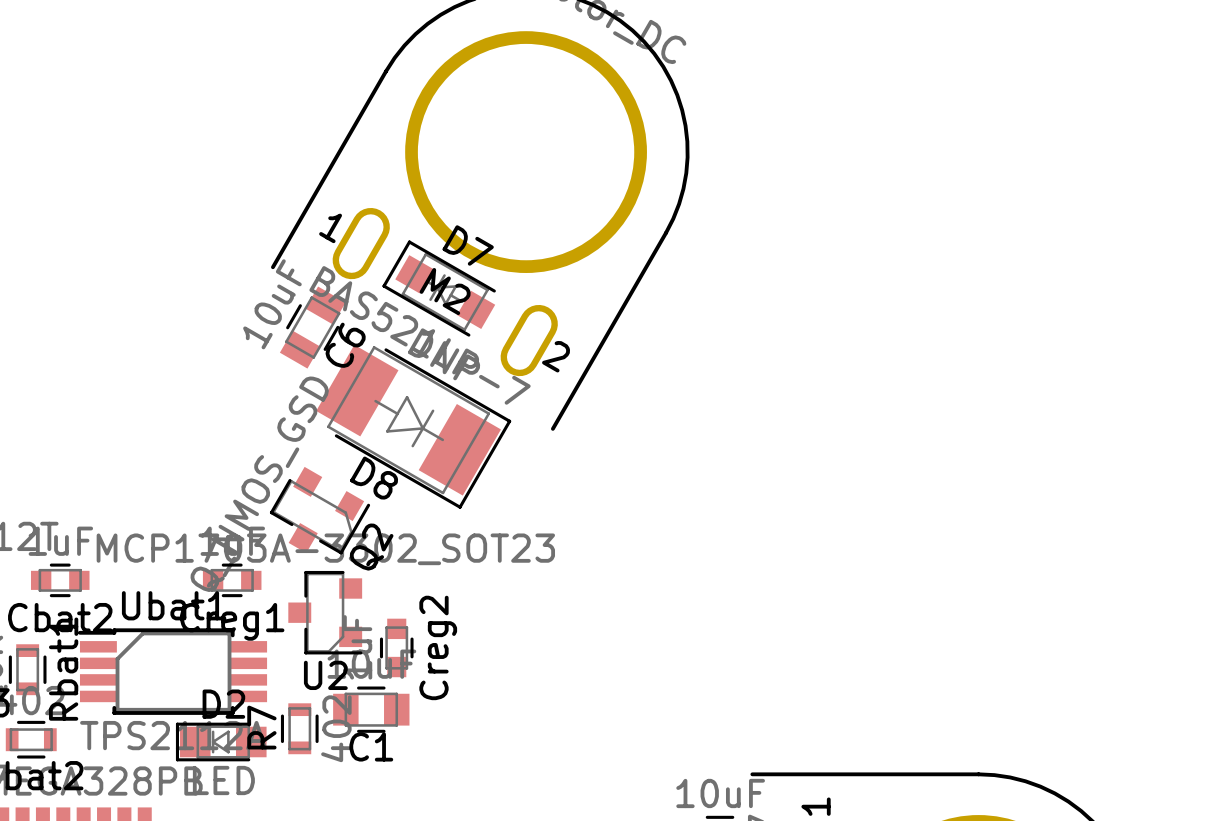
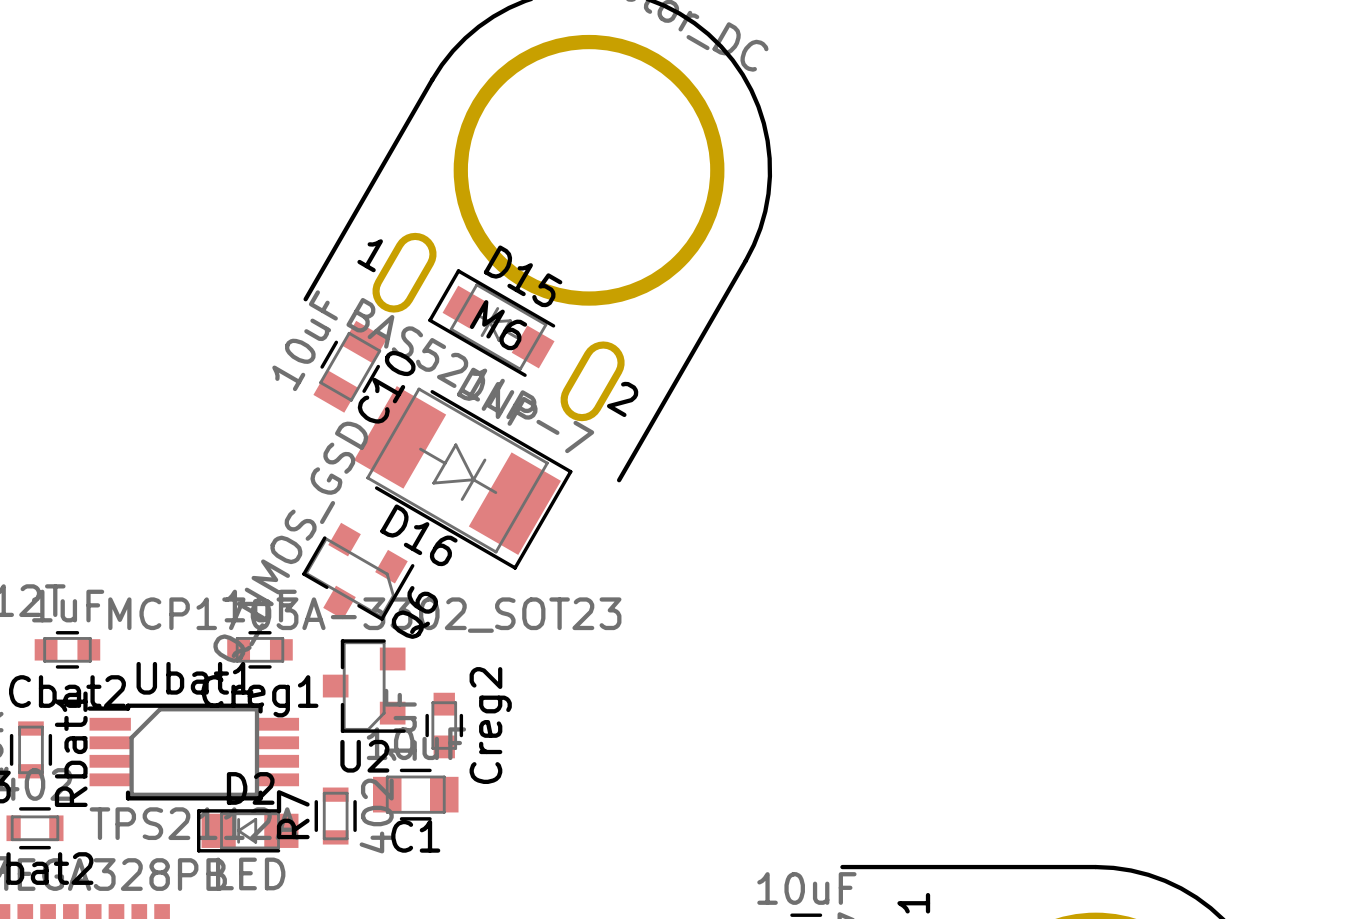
D7 name: D7 (468, 245) -> D15 (523, 276)
M2 name: M2 (445, 291) -> M6 (498, 325)
C6 name: C6 (345, 345) -> C10 (386, 387)
D8 name: D8 (374, 478) -> D16 (418, 535)
Q2 name: Q2 (371, 547) -> Q6 (414, 612)

